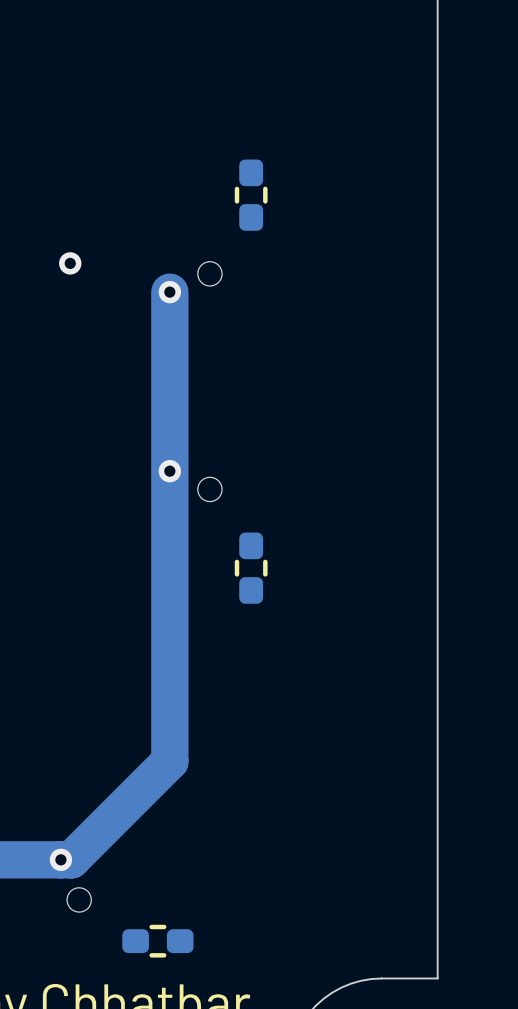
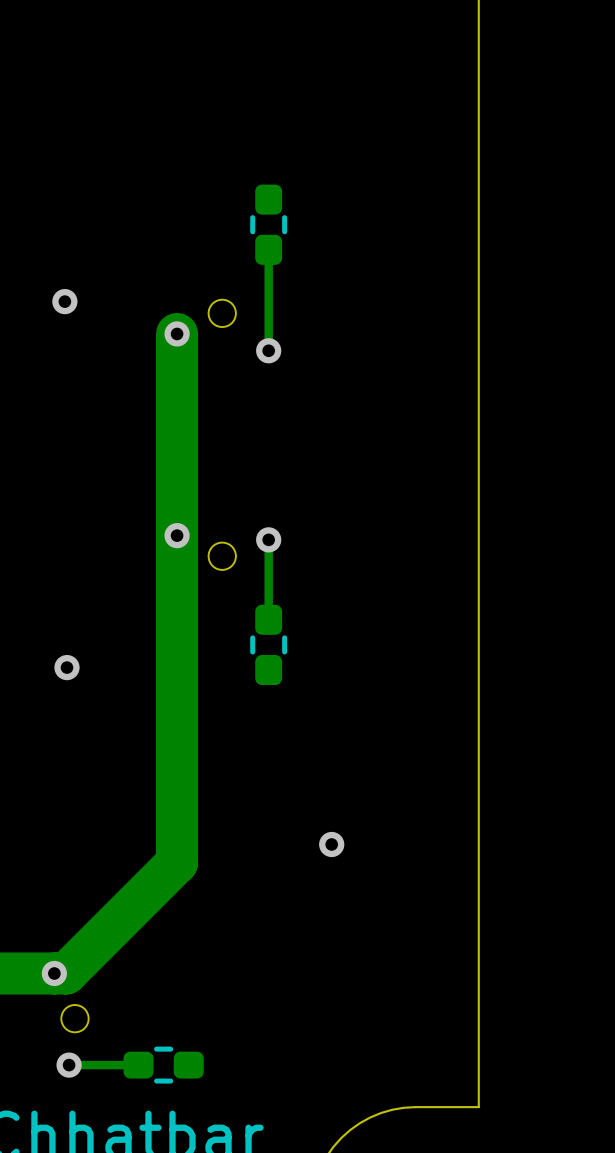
track: none -> (268, 249) (268, 350)
via: none -> (268, 350)
track: none -> (268, 539) (268, 619)
via: none -> (268, 539)
via: none -> (66, 667)
via: none -> (331, 844)
via: none -> (69, 1065)
track: none -> (138, 1065) (69, 1065)

